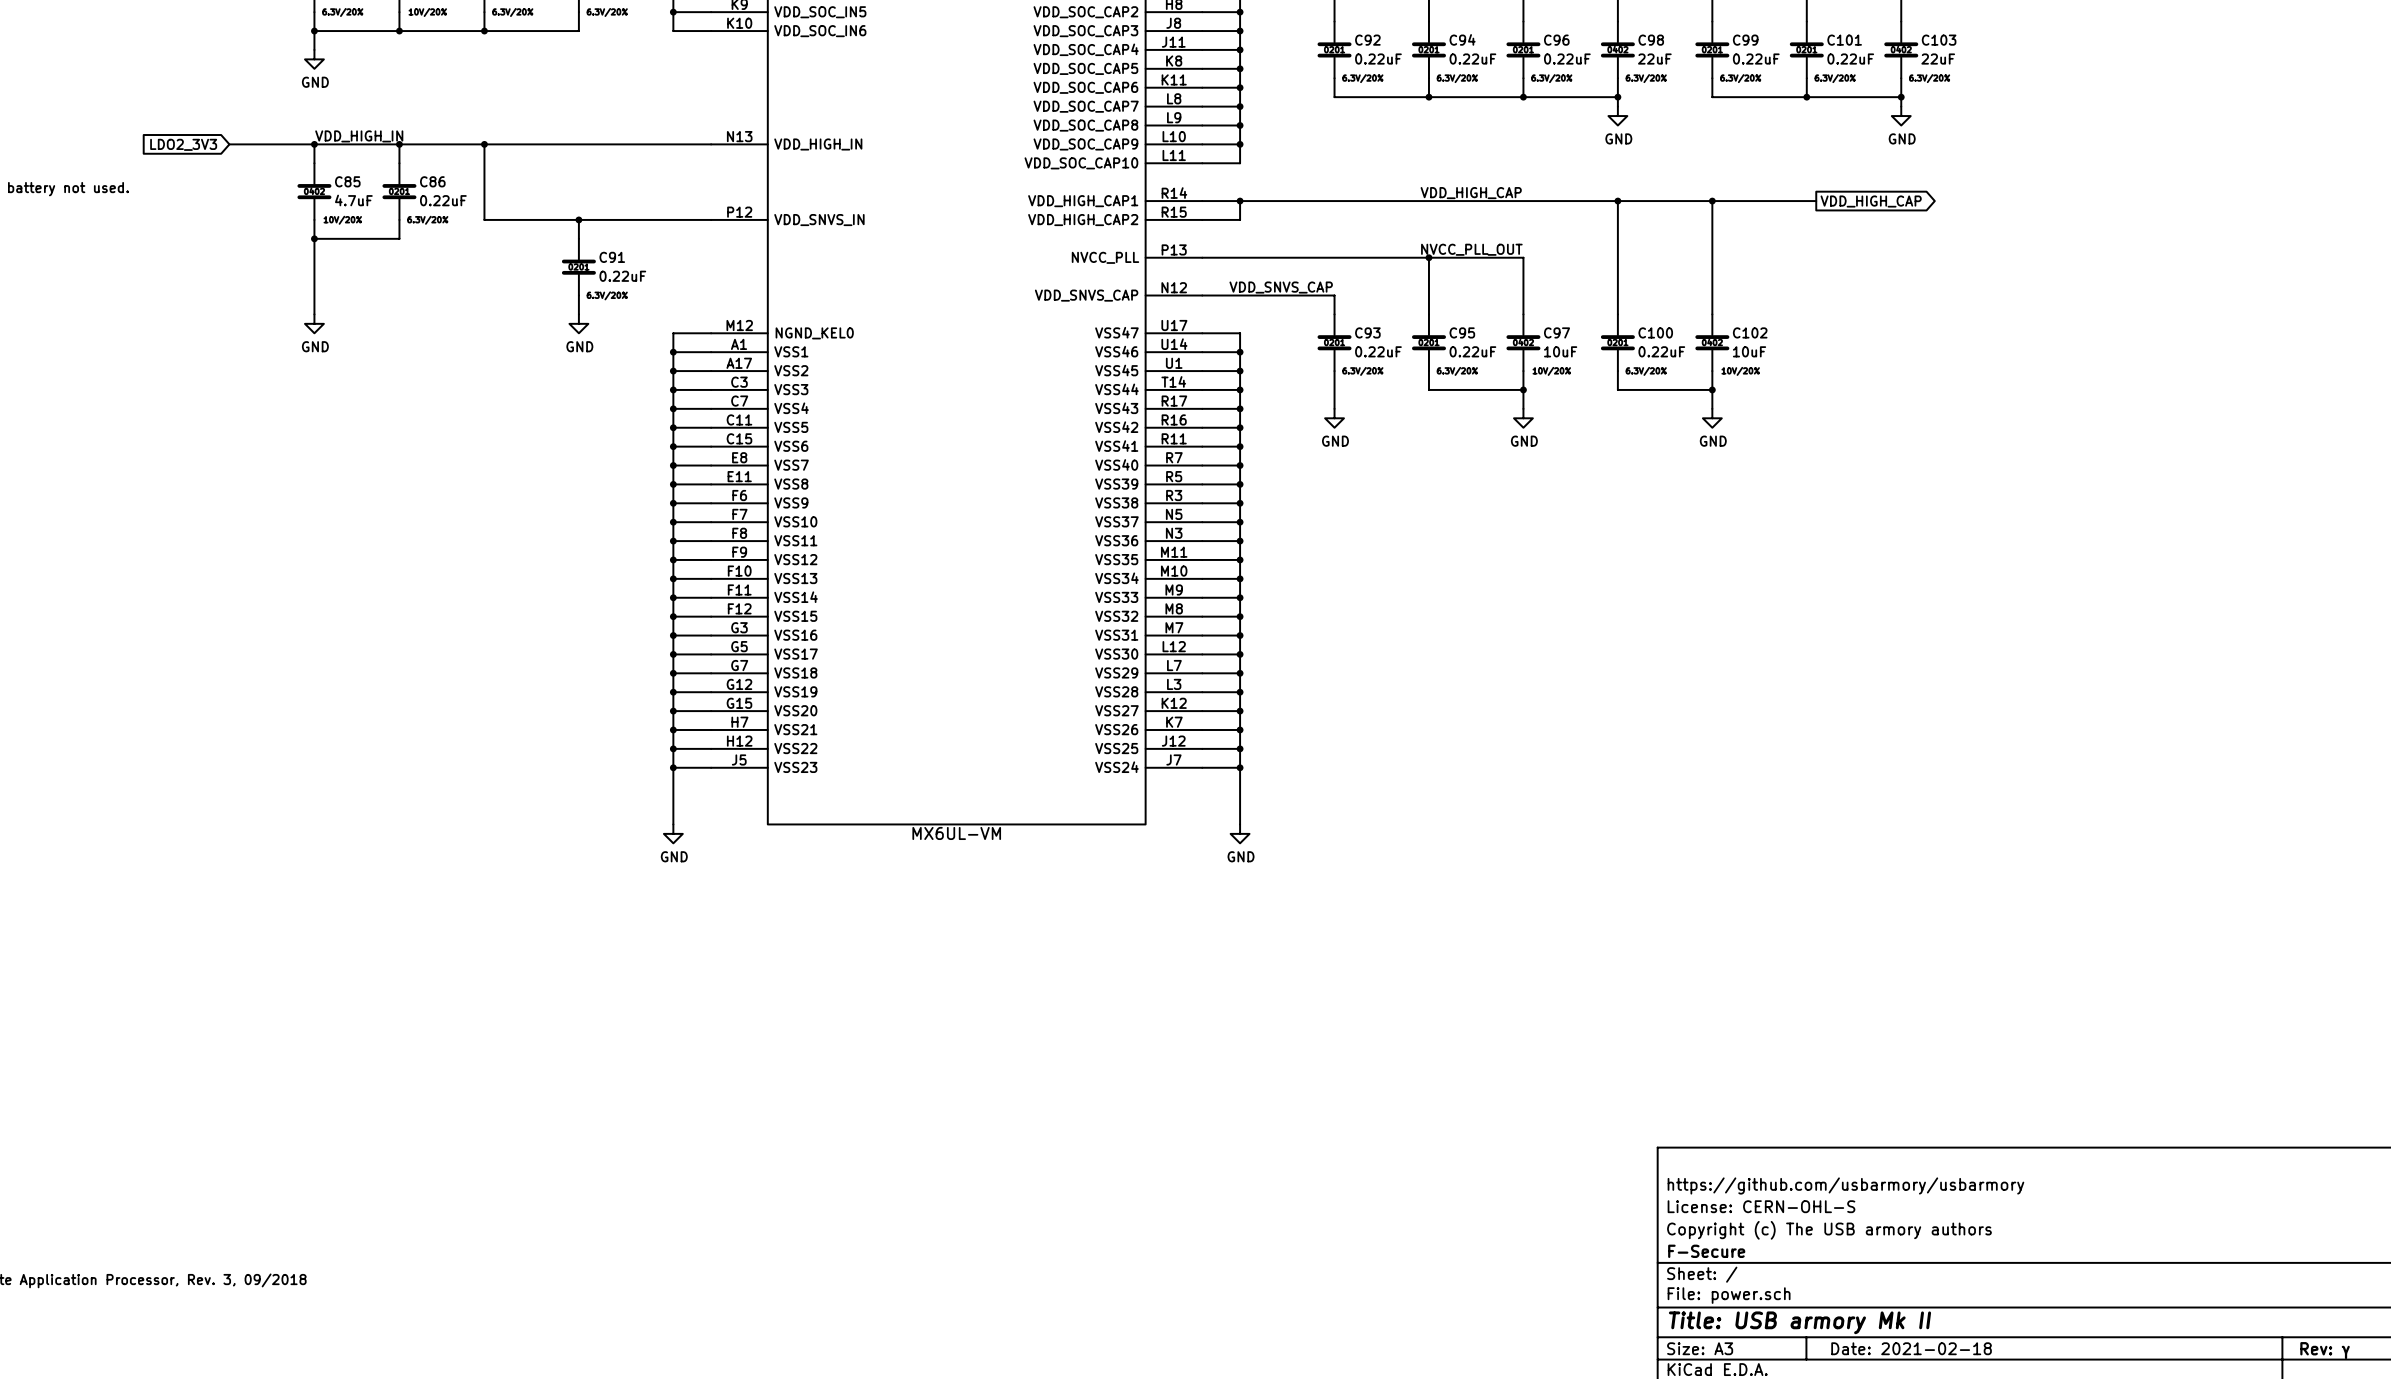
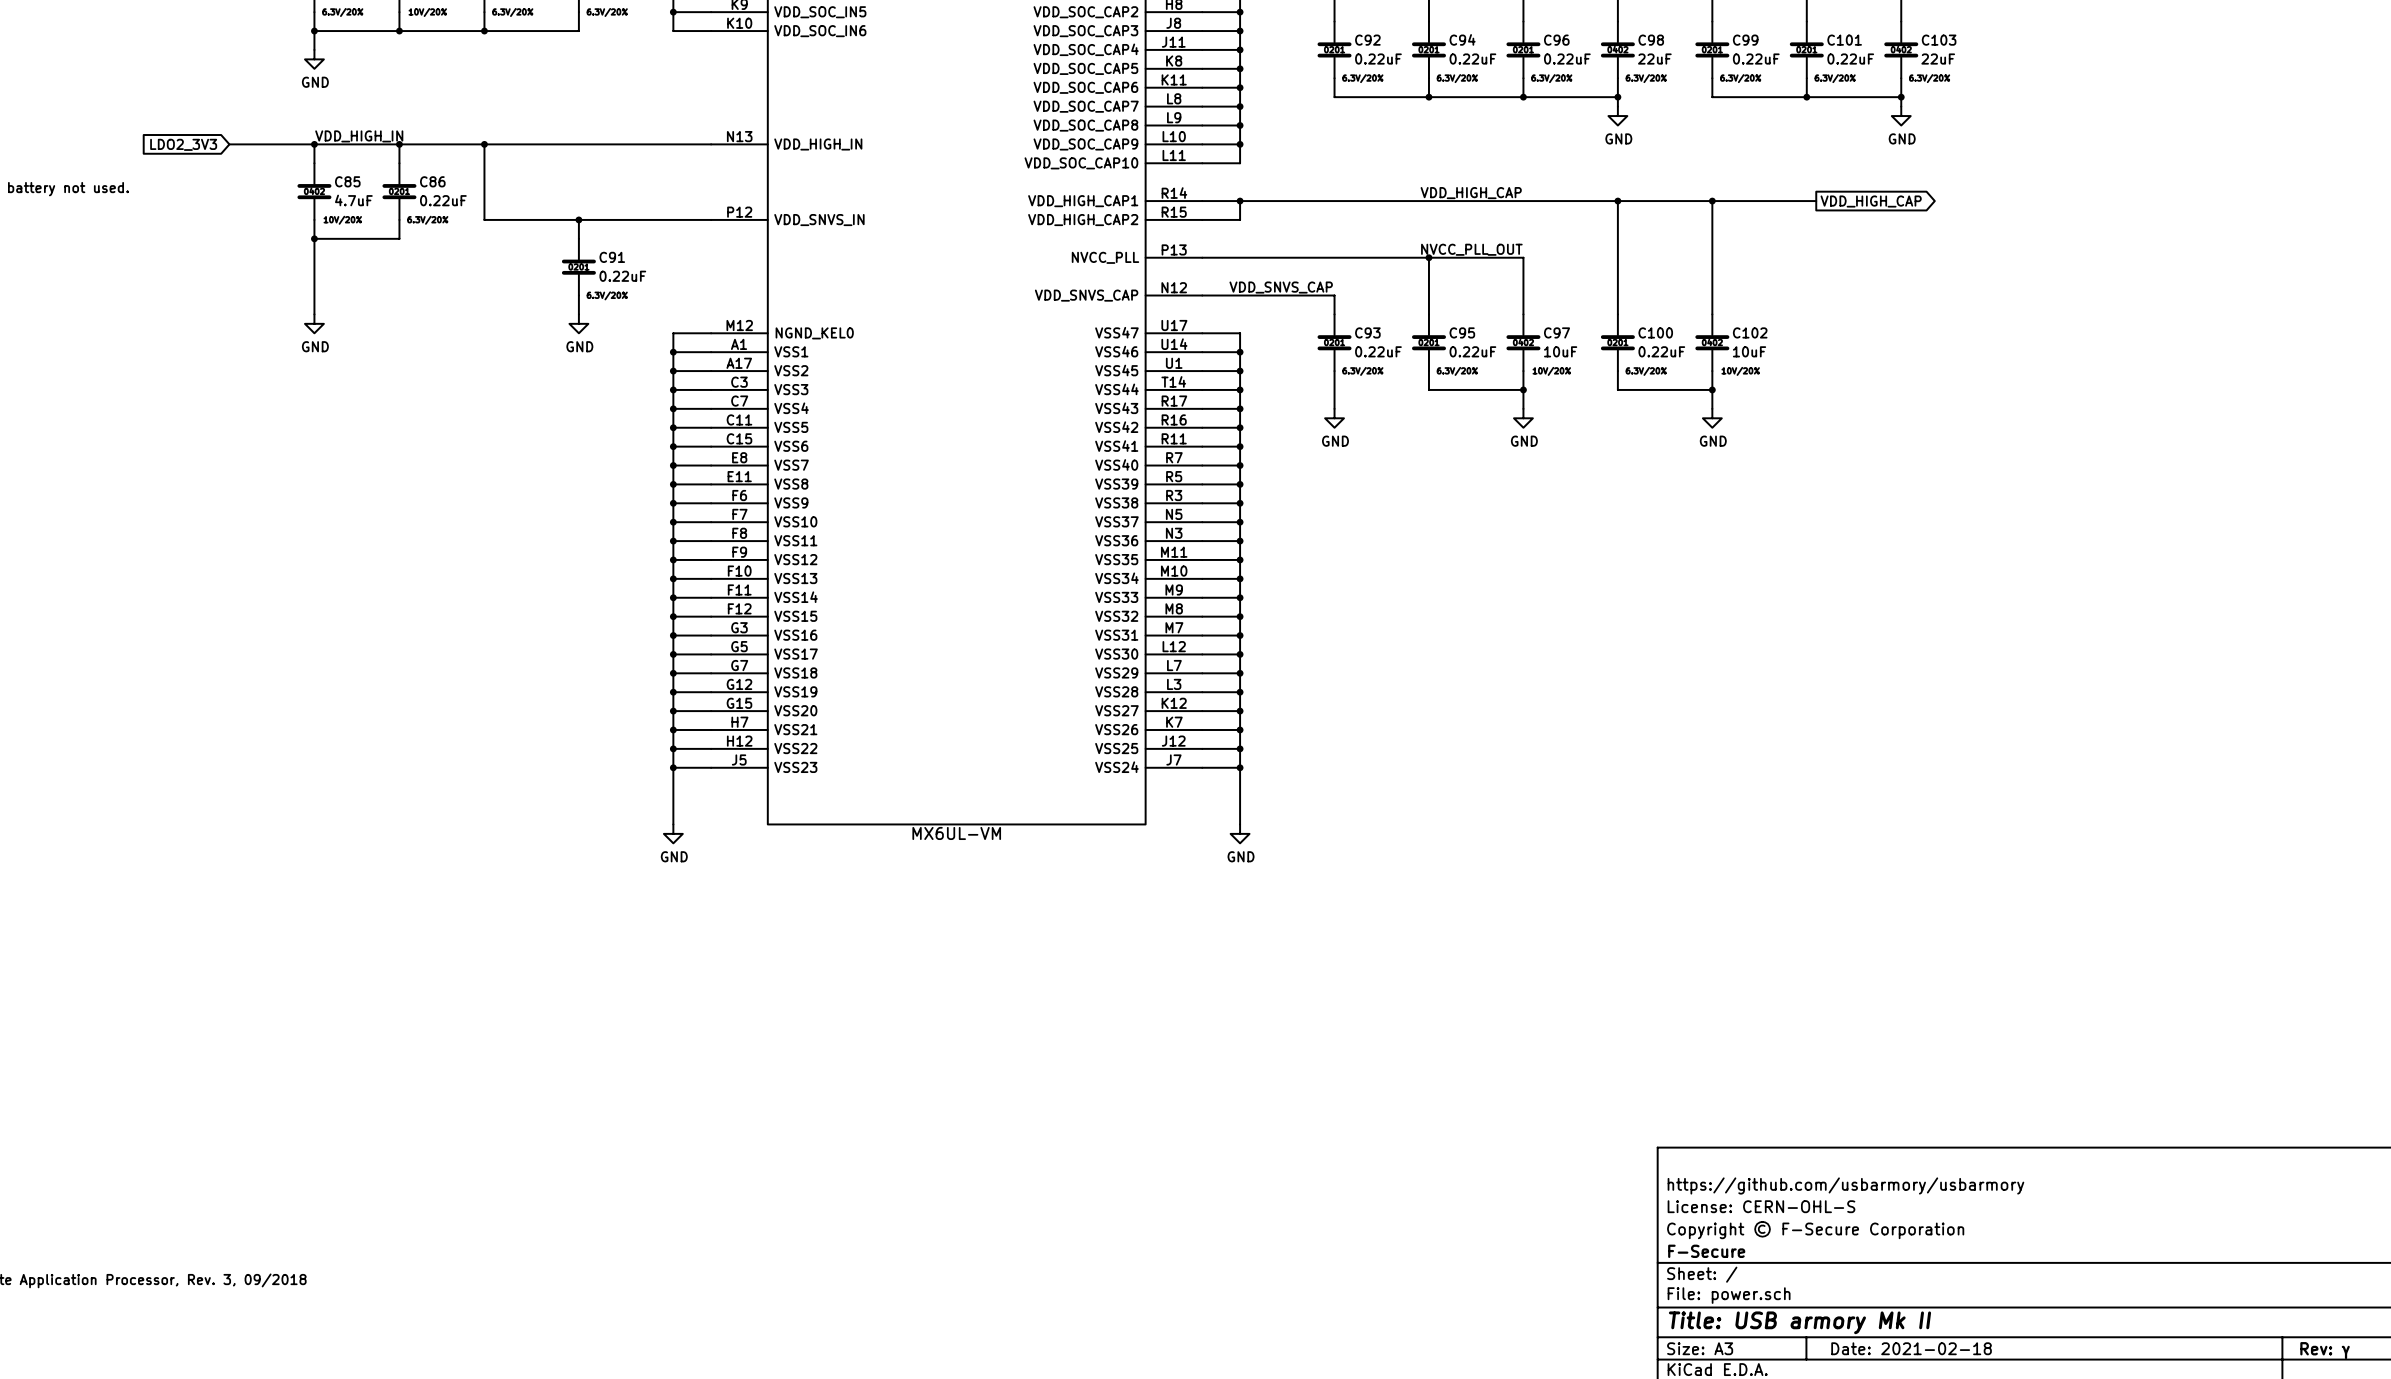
title block: Copyright (c) The USB armory authors (1829, 1230) -> Copyright © F-Secure Corporation (1815, 1230)

